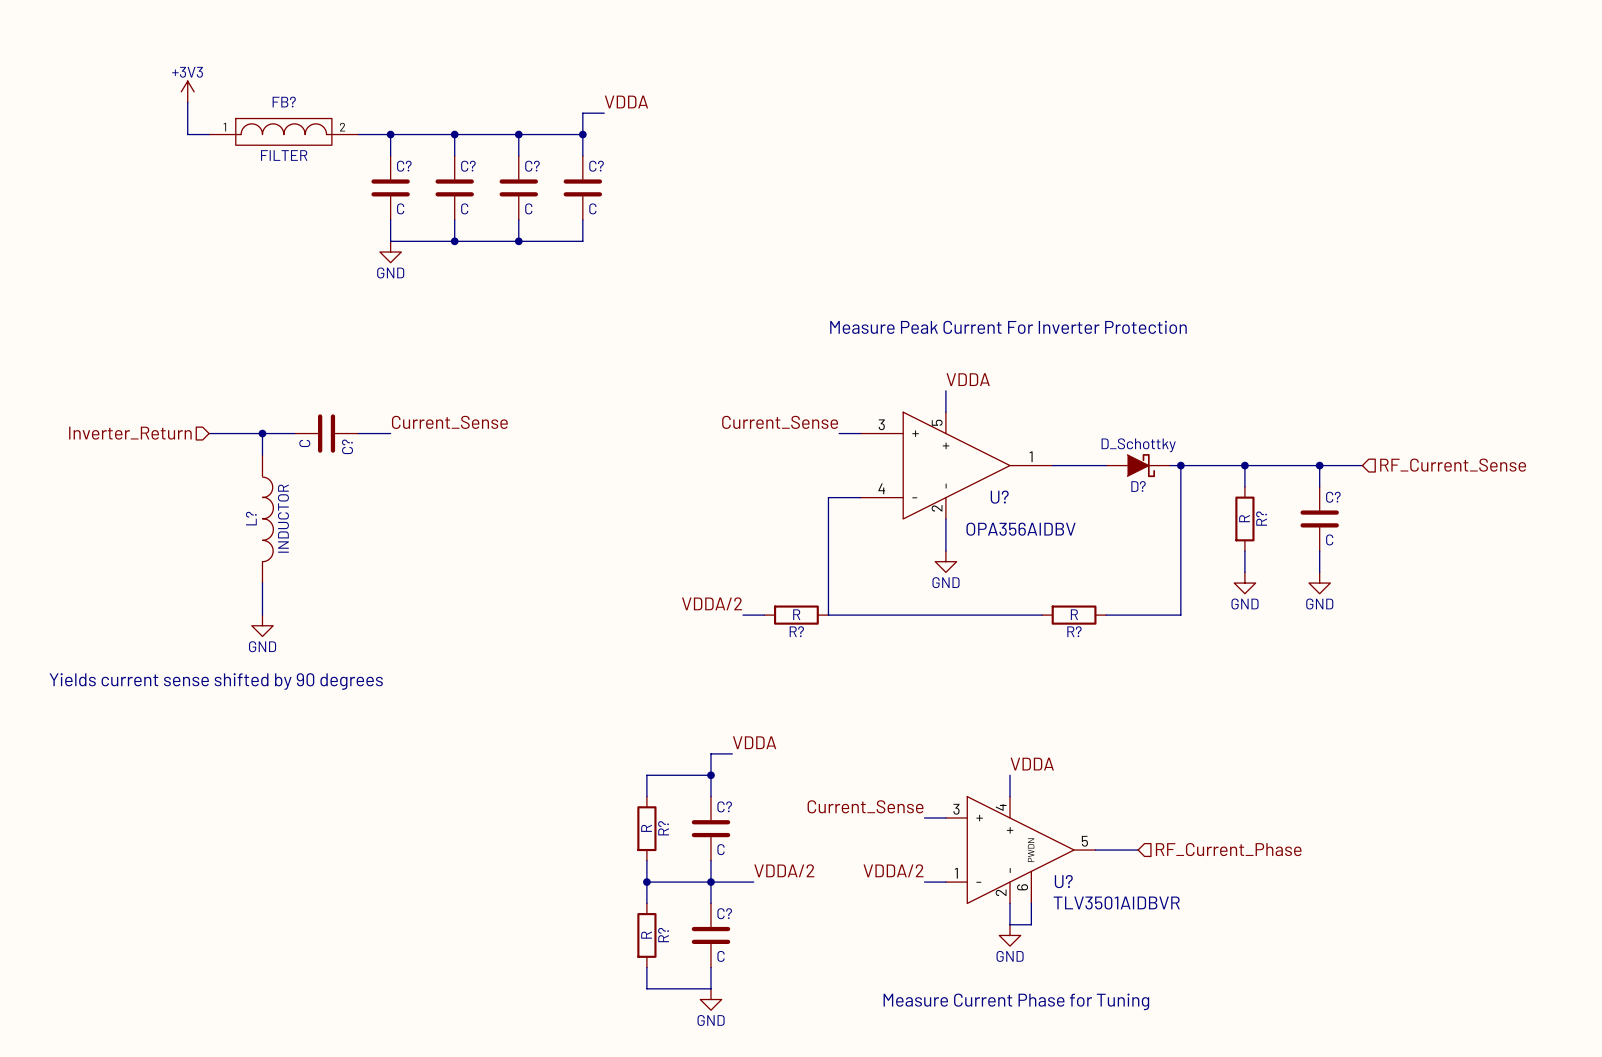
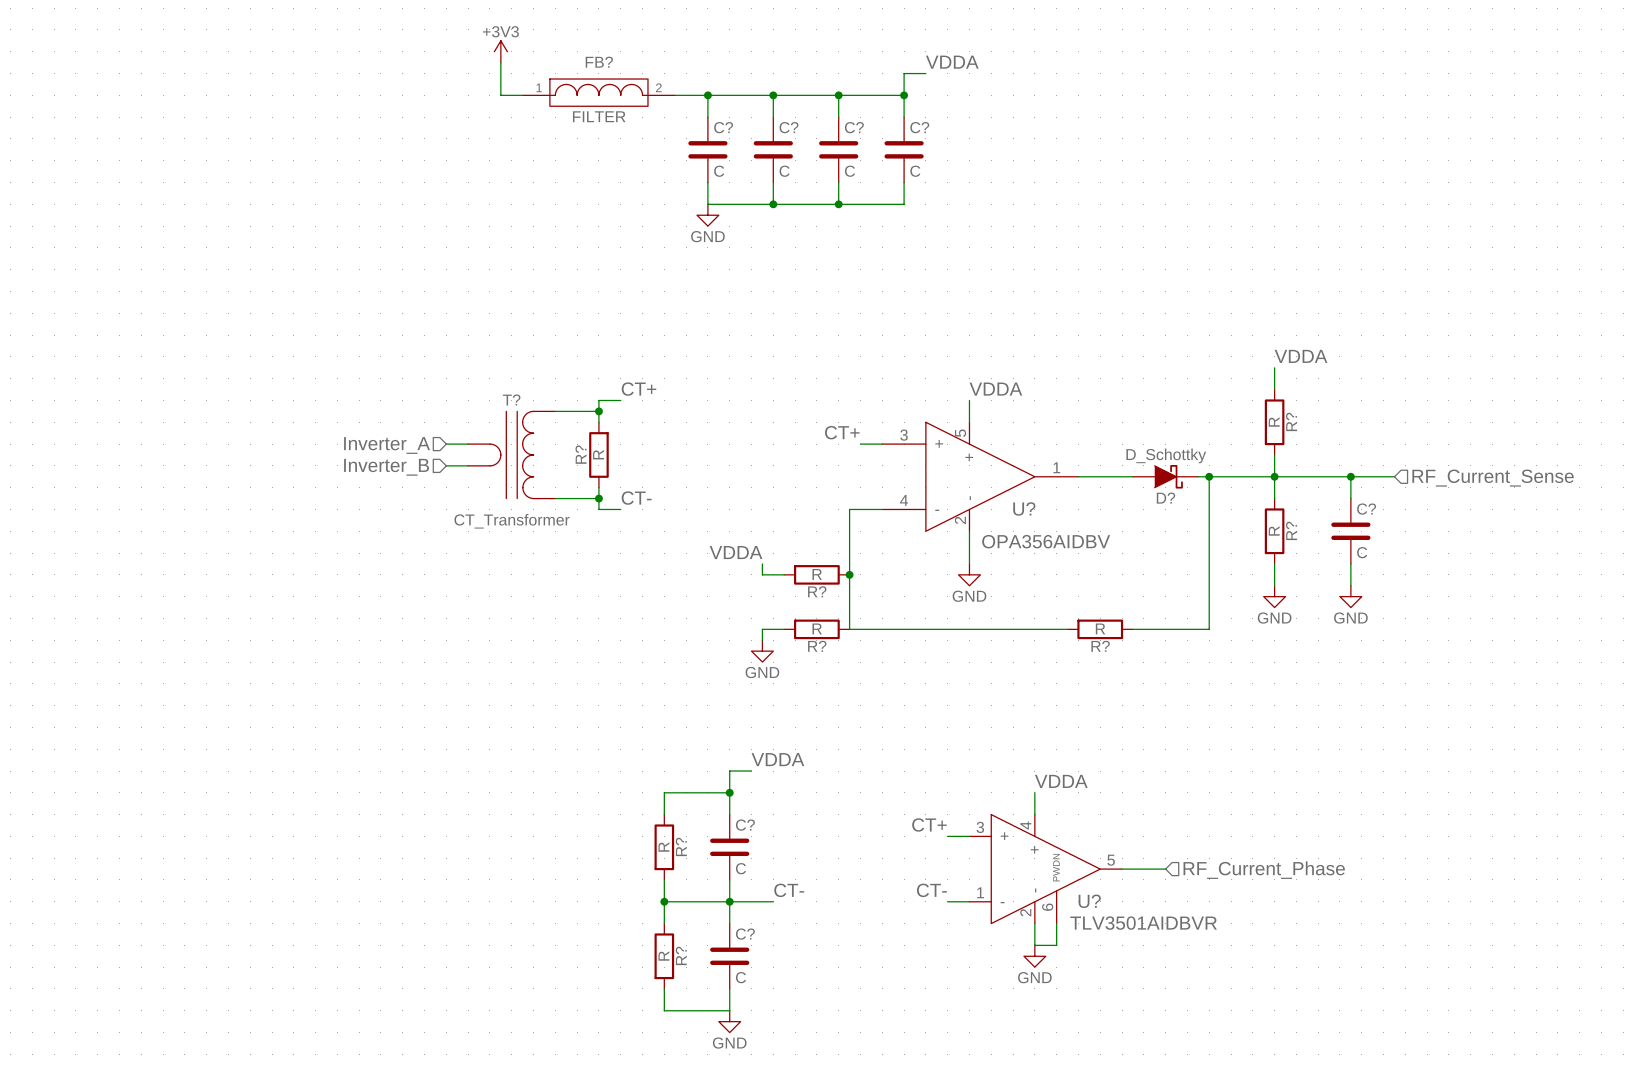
power symbol: none -> +3V3 (500, 51)
wire: none -> (500, 62) (500, 95) (522, 95)
label: none -> VDDA (952, 62)
wire: none -> (925, 73) (904, 73) (904, 117)
FB?: none -> FILTER (598, 92)
power symbol: +3V3 (187, 91) -> none
wire: none -> (675, 95) (904, 95)
junction: none -> (707, 95)
wire: none -> (773, 95) (773, 117)
junction: none -> (773, 95)
wire: none -> (838, 95) (838, 117)
junction: none -> (838, 95)
junction: none -> (904, 95)
wire: (187, 102) (187, 134) (209, 134) -> none
label: VDDA (626, 102) -> none
wire: (604, 113) (582, 113) (582, 155) -> none
FB?: FILTER (283, 131) -> none
wire: (358, 134) (582, 134) -> none
wire: (390, 134) (390, 155) -> none
junction: (390, 134) -> none
wire: (454, 134) (454, 155) -> none
junction: (454, 134) -> none
wire: (518, 134) (518, 155) -> (707, 95) (707, 117)
junction: (518, 134) -> none
junction: (582, 134) -> none
C?: none -> C (707, 149)
C?: none -> C (773, 149)
C?: none -> C (838, 149)
C?: none -> C (904, 149)
wire: none -> (707, 182) (707, 204) (904, 204) (904, 182)
wire: none -> (773, 182) (773, 204)
wire: none -> (838, 182) (838, 204)
C?: C (390, 187) -> none
C?: C (454, 187) -> none
C?: C (518, 187) -> none
C?: C (582, 187) -> none
junction: none -> (773, 204)
junction: none -> (838, 204)
power symbol: none -> GND (707, 215)
wire: (390, 219) (390, 241) (582, 241) (582, 219) -> none
wire: (454, 219) (454, 241) -> none
wire: (518, 219) (518, 241) -> none
junction: (454, 241) -> none
junction: (518, 241) -> none
power symbol: GND (390, 252) -> none
text: Measure Peak Current For Inverter Protection (1008, 327) -> none
label: none -> VDDA (1301, 356)
wire: none -> (1274, 367) (1274, 389)
label: none -> CT+ (638, 389)
wire: none -> (620, 400) (598, 400) (598, 422)
wire: none -> (555, 411) (598, 411)
junction: none -> (598, 411)
R?: none -> R (1274, 422)
label: Current_Sense (449, 422) -> none
label: Current_Sense (780, 422) -> CT+ (842, 432)
hierarchical label: Inverter_Return (130, 433) -> none
wire: (209, 433) (294, 433) -> none
wire: (262, 433) (262, 454) -> none
junction: (262, 433) -> none
C?: C (326, 433) -> none
wire: (358, 433) (390, 433) -> none
hierarchical label: none -> Inverter_A (387, 445)
wire: none -> (446, 444) (468, 444)
T?: none -> CT_Transformer (511, 454)
R?: none -> R (598, 454)
wire: none -> (1274, 454) (1274, 476)
hierarchical label: none -> Inverter_B (386, 467)
wire: none -> (446, 465) (468, 465)
wire: none -> (598, 487) (598, 509) (620, 509)
wire: none -> (555, 498) (598, 498)
junction: none -> (598, 498)
label: none -> CT- (636, 498)
L?: INDUCTOR (267, 518) -> none
label: none -> VDDA (736, 552)
wire: none -> (762, 563) (762, 574) (784, 574)
R?: none -> R (816, 574)
junction: none -> (849, 574)
wire: (262, 583) (262, 615) -> none
label: VDDA/2 (711, 603) -> none
wire: none -> (762, 629) (762, 640)
power symbol: GND (262, 625) -> none
power symbol: none -> GND (762, 651)
text: Yields current sense shifted by 90 degrees (216, 681) -> none
label: Current_Sense (865, 806) -> CT+ (929, 824)
label: VDDA/2 (784, 870) -> CT- (789, 890)
label: VDDA/2 (893, 870) -> CT- (931, 890)
text: Measure Current Phase for Tuning (1016, 1001) -> none

